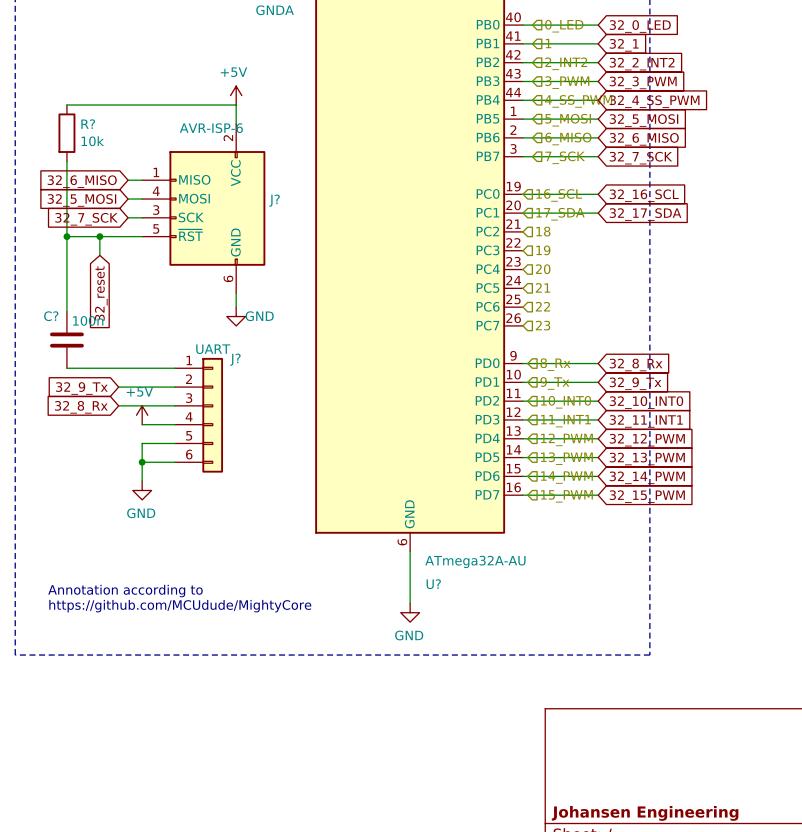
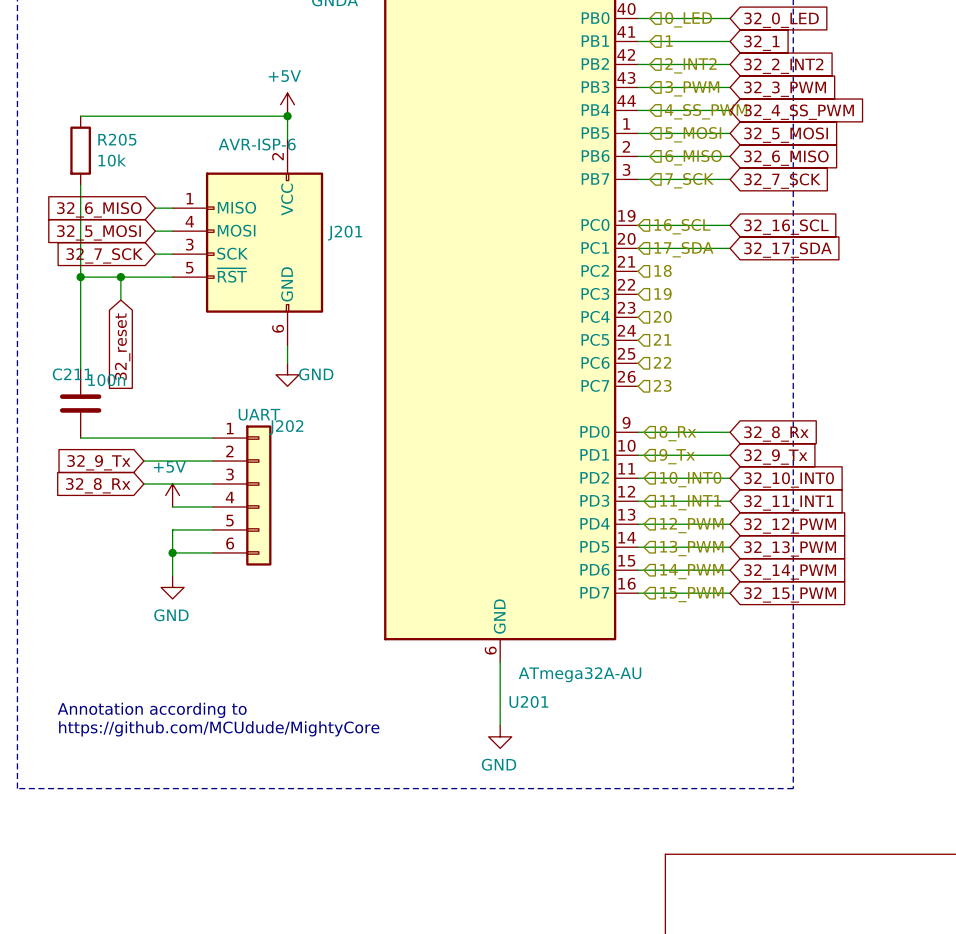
junction: none -> (287, 116)
R? name: R? (88, 124) -> R205 (117, 139)
J? name: J? (274, 200) -> J201 (345, 233)
C? name: C? (51, 316) -> C211 (72, 374)
J? name: J? (235, 359) -> J202 (286, 427)
U? name: U? (433, 584) -> U201 (528, 701)

